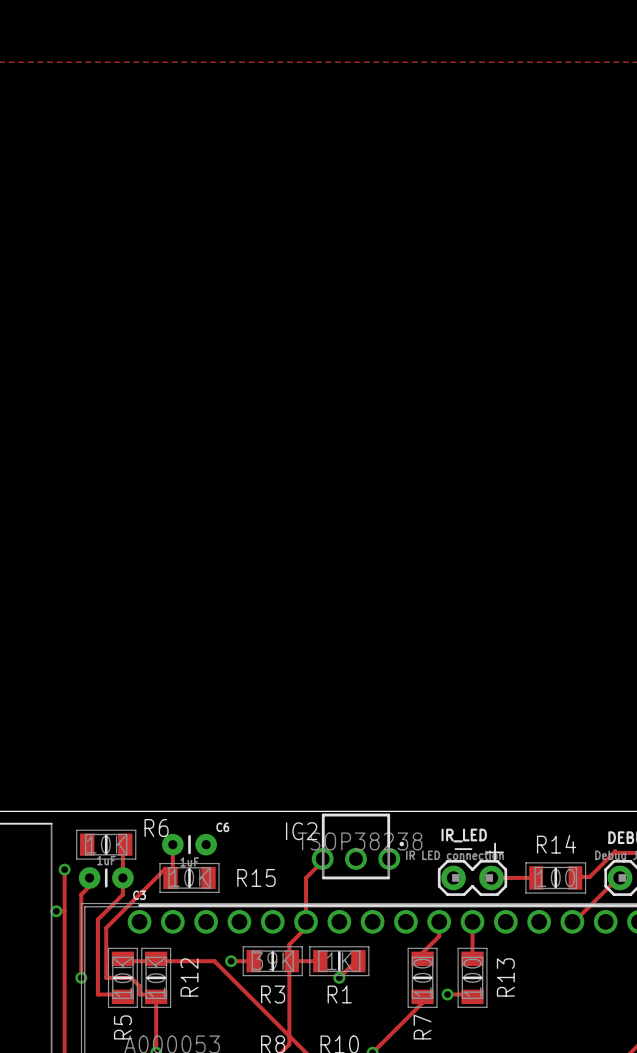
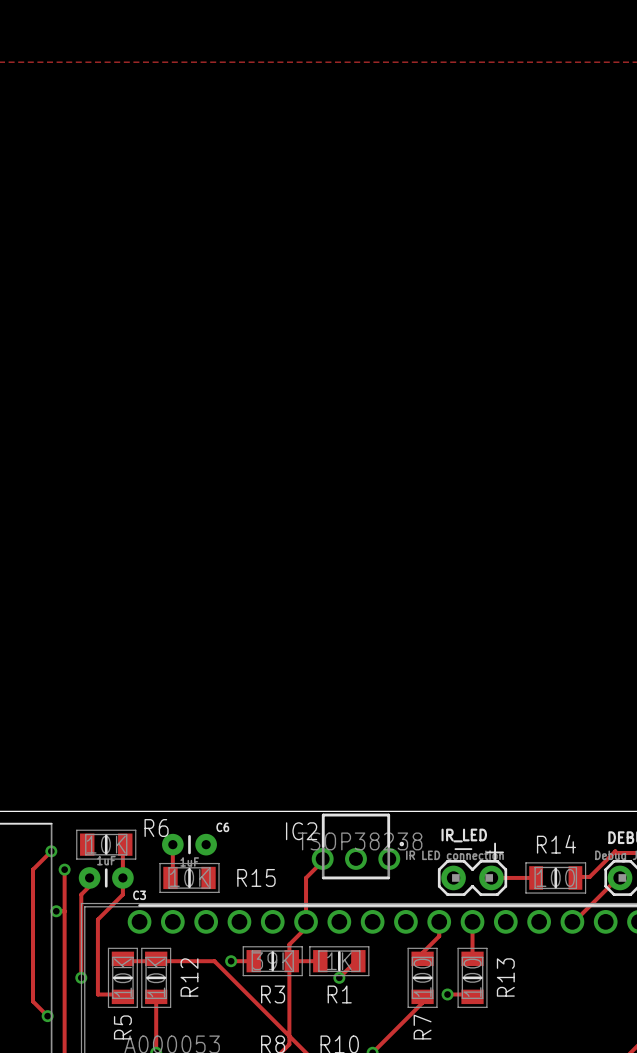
track: none -> (51, 851) (33, 869) (33, 1001) (47, 1016)
via: none -> (51, 851)
track: (172, 869) (164, 869) (106, 927) (106, 977) (131, 977) (139, 986) (139, 994) (156, 994) (156, 996) -> none
via: none -> (47, 1016)

